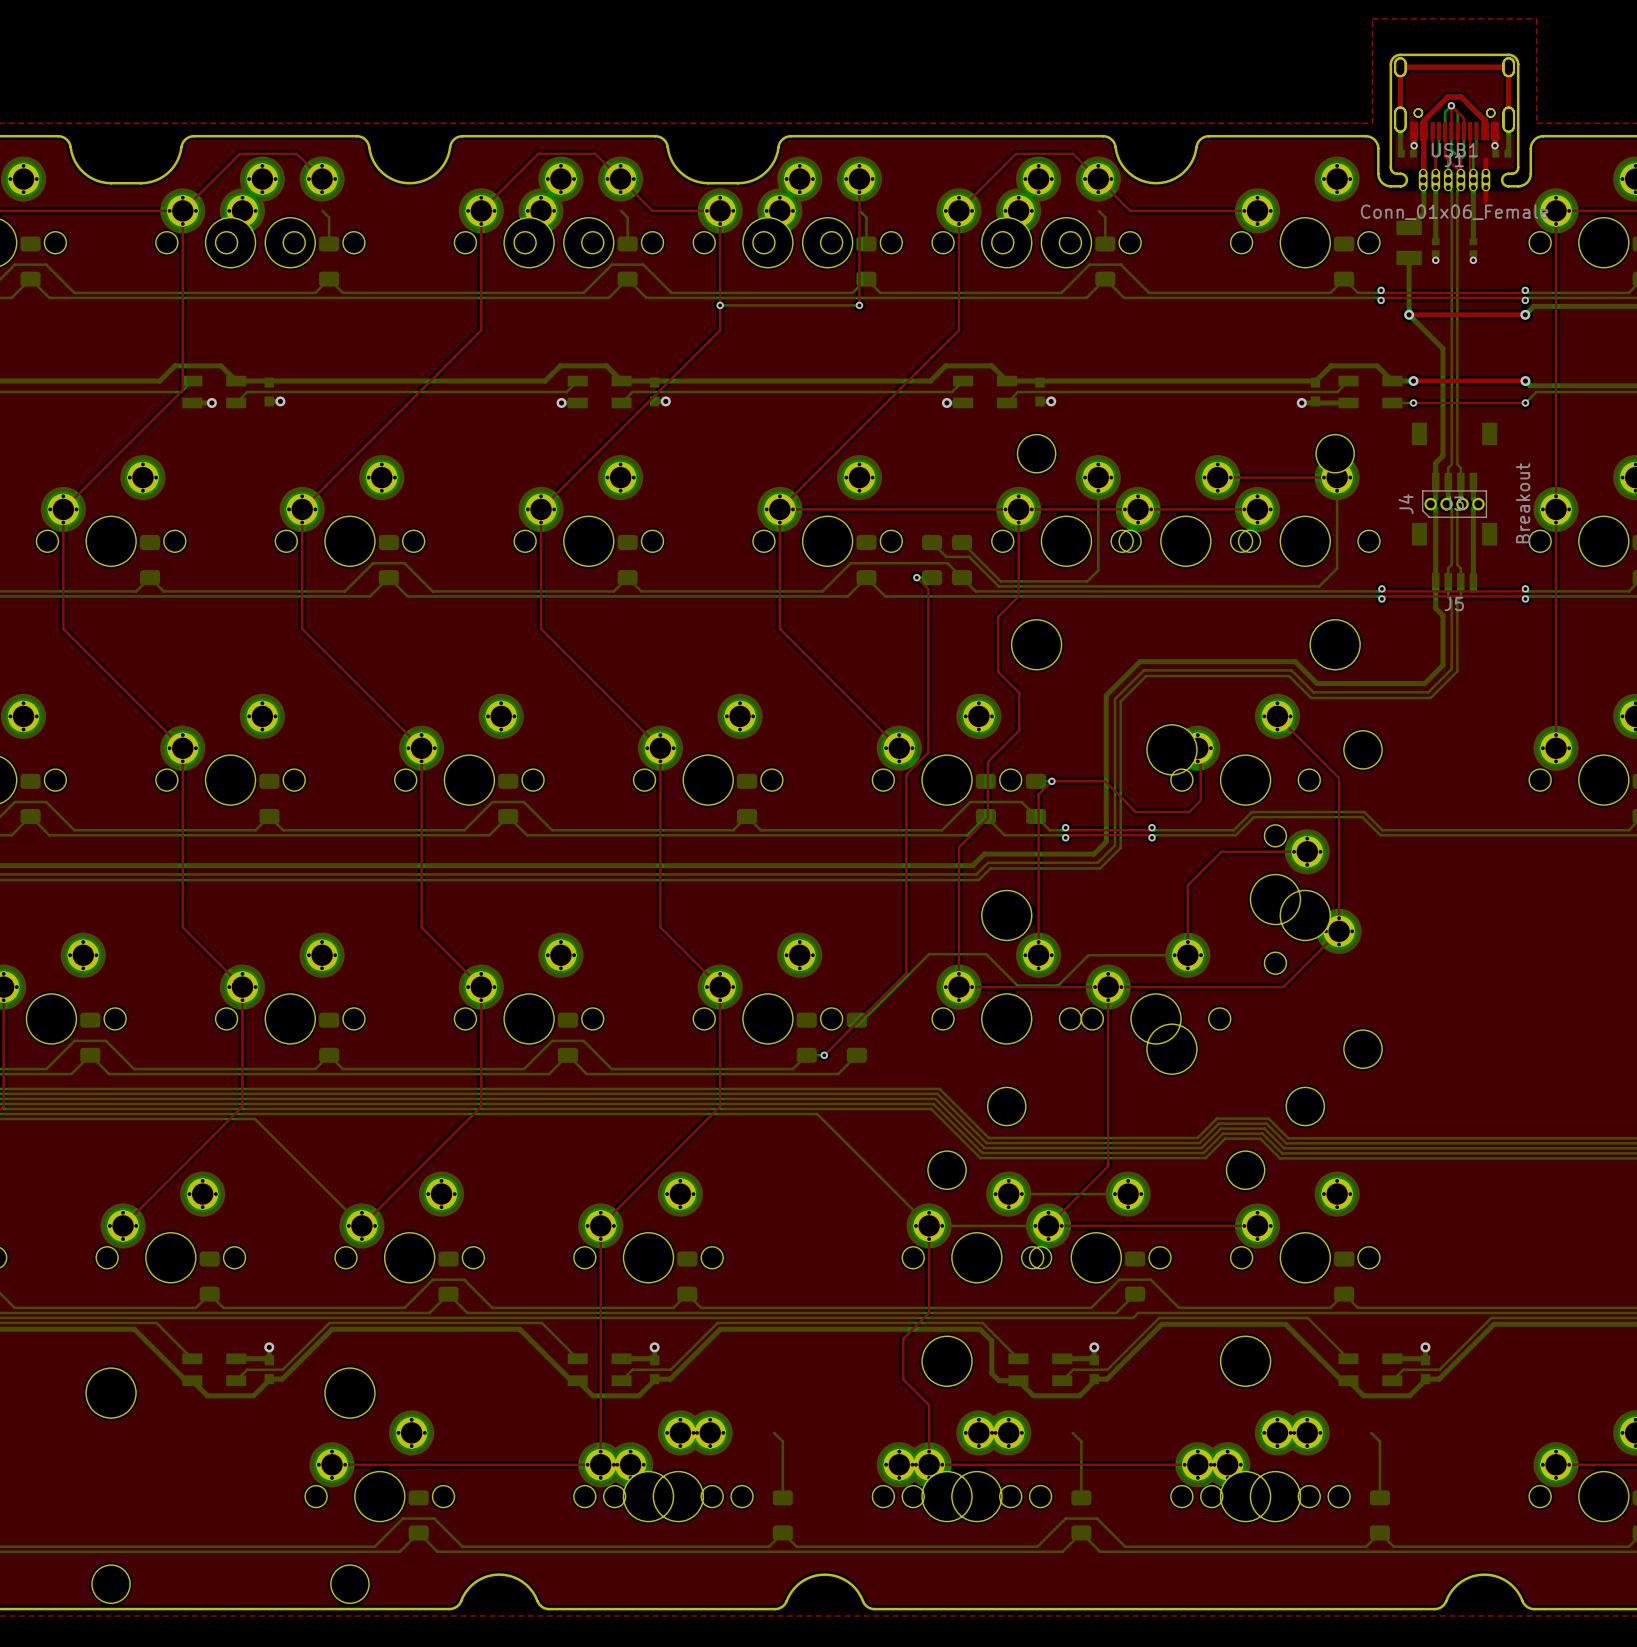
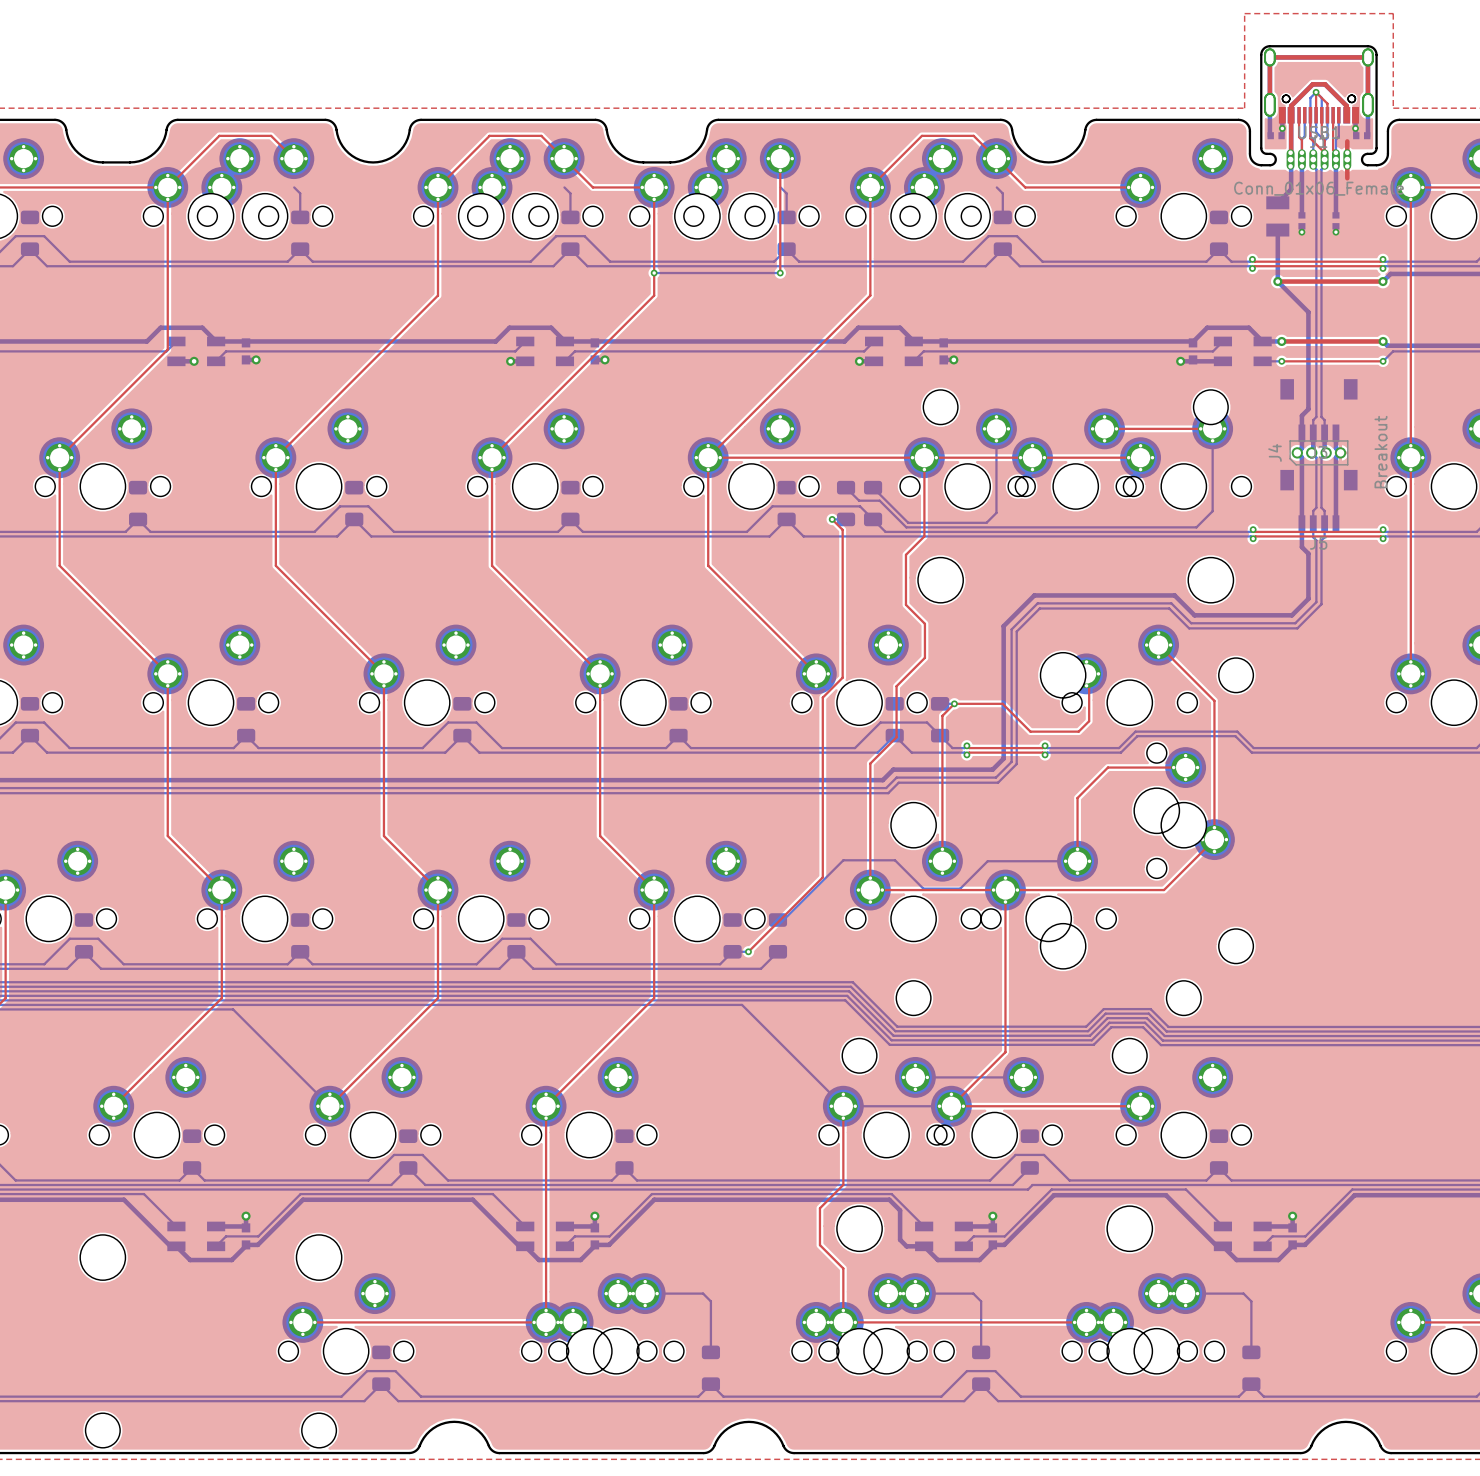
bottom track: none -> (645, 1293) (703, 1293)
bottom track: none -> (915, 1293) (973, 1293)
bottom track: none -> (1185, 1293) (1243, 1293)

